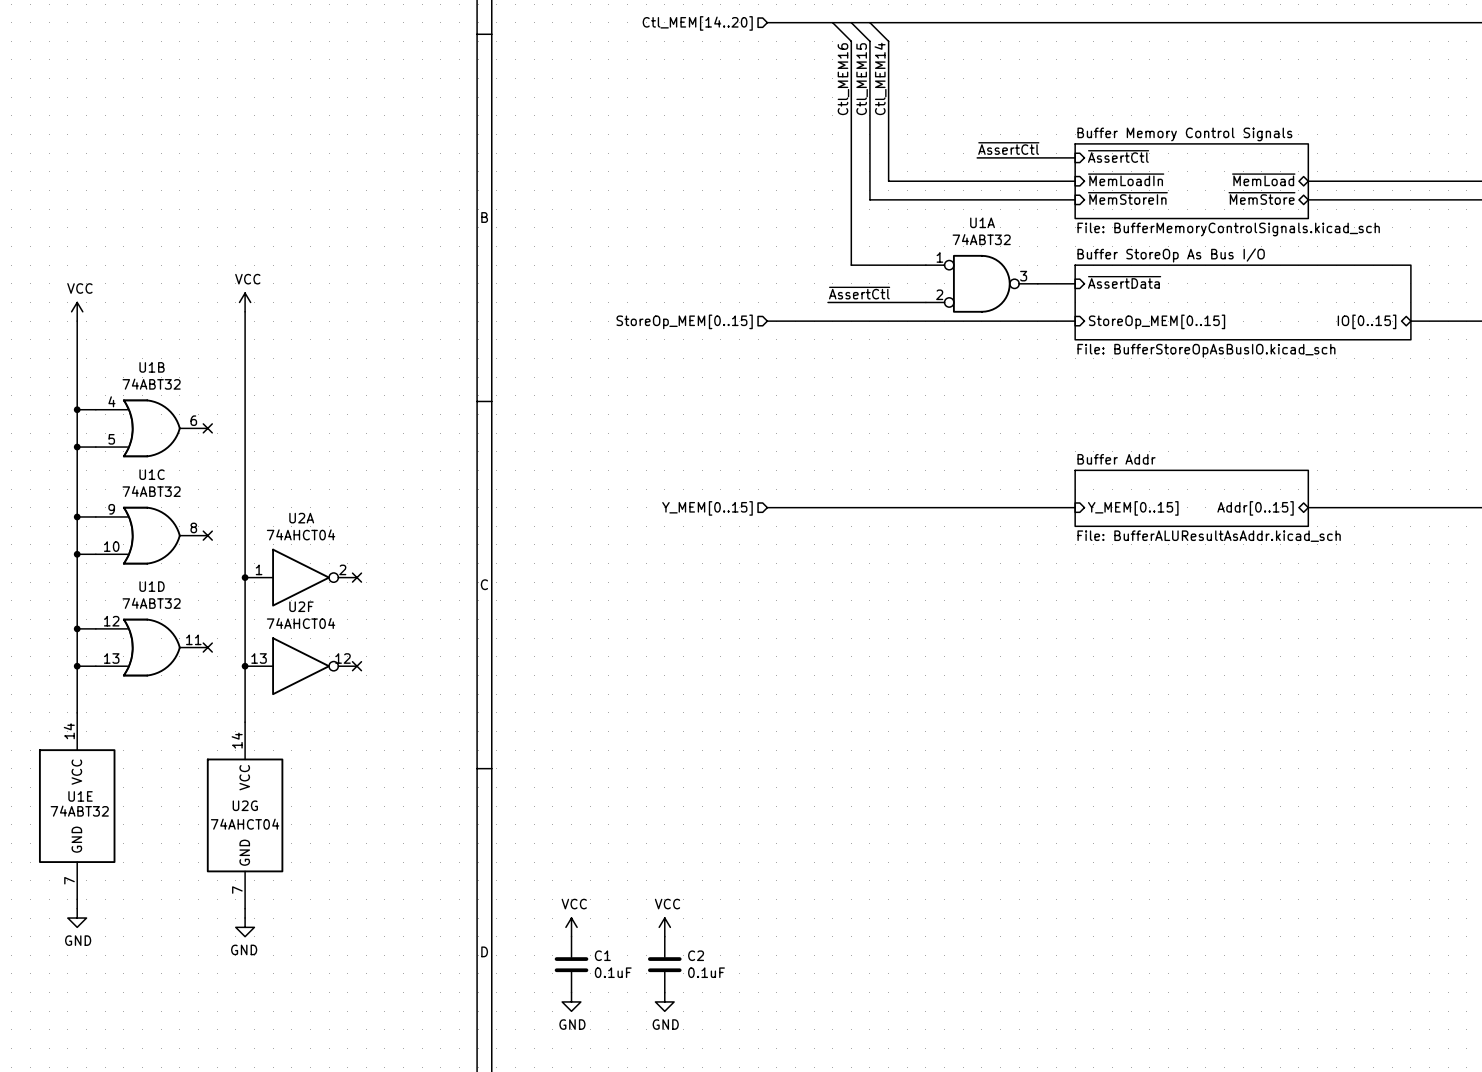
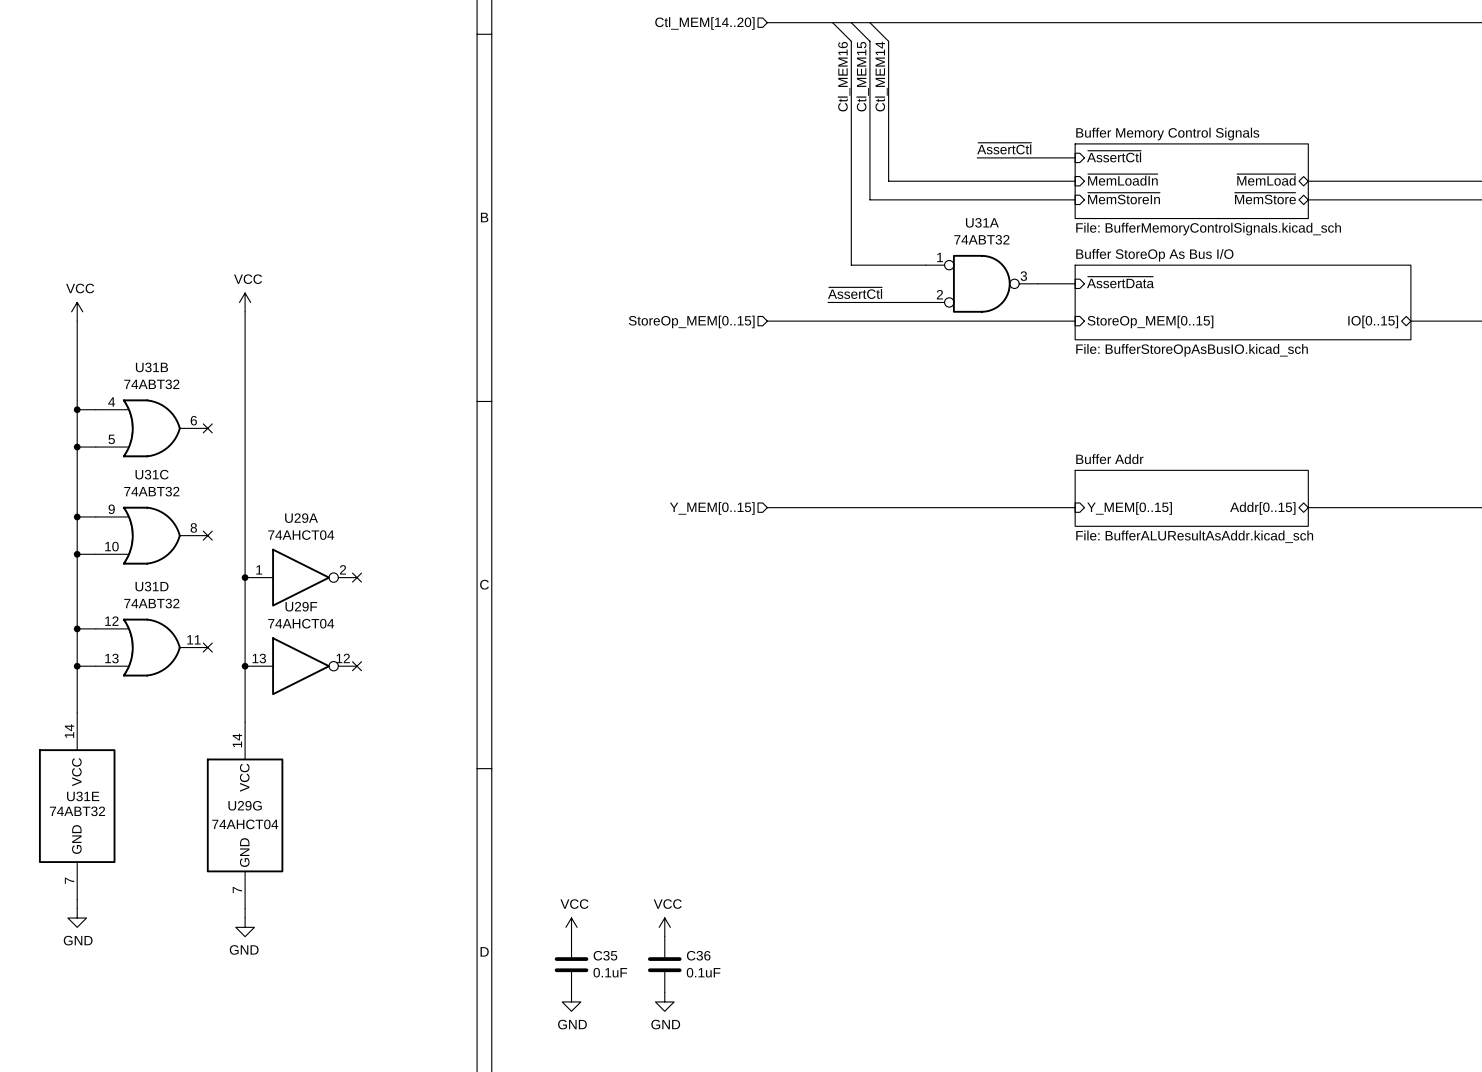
U1A name: U1A (982, 222) -> U31A (982, 222)
U1B name: U1B (152, 367) -> U31B (151, 367)
U1C name: U1C (152, 474) -> U31C (152, 474)
U2A name: U2A (301, 518) -> U29A (301, 518)
U1D name: U1D (152, 586) -> U31D (152, 586)
U2F name: U2F (301, 606) -> U29F (301, 606)
U1E name: U1E (80, 796) -> U31E (83, 796)
U2G name: U2G (245, 805) -> U29G (245, 805)
C1 name: C1 (602, 955) -> C35 (605, 955)
C2 name: C2 (696, 955) -> C36 (698, 955)

